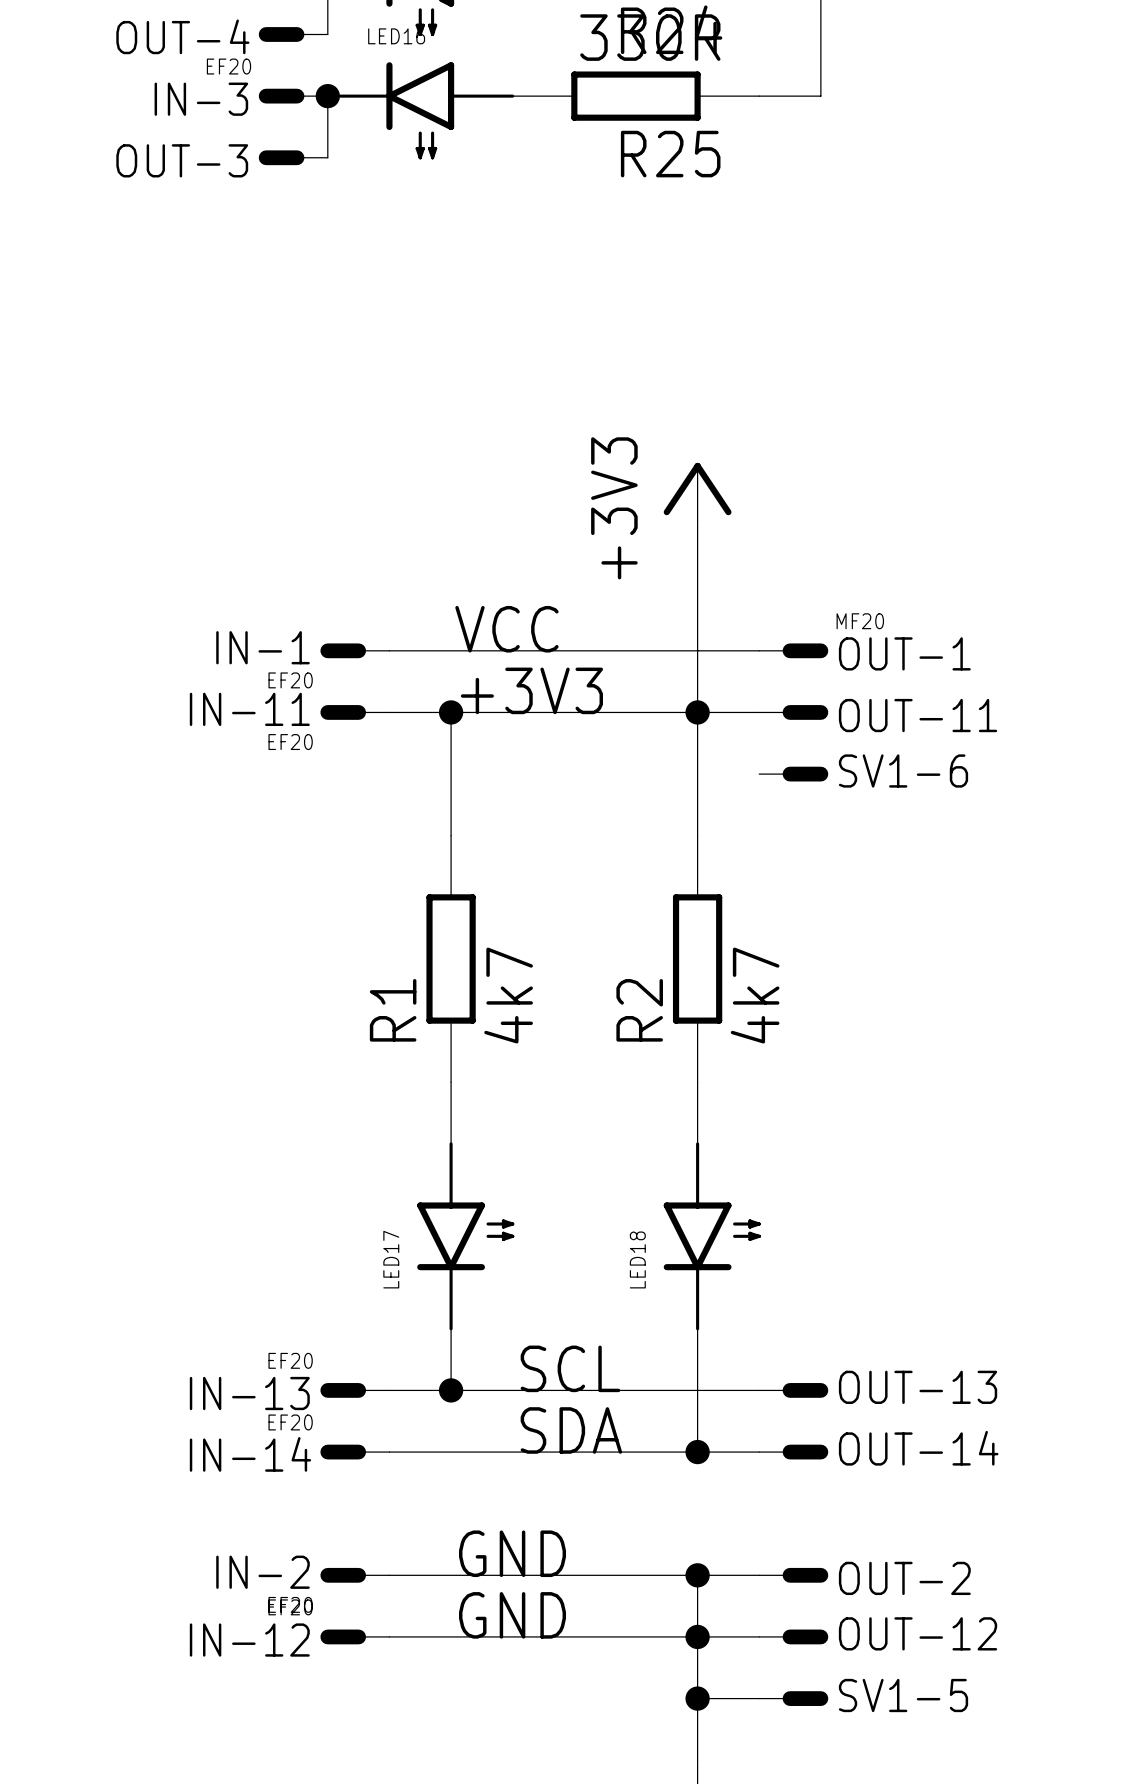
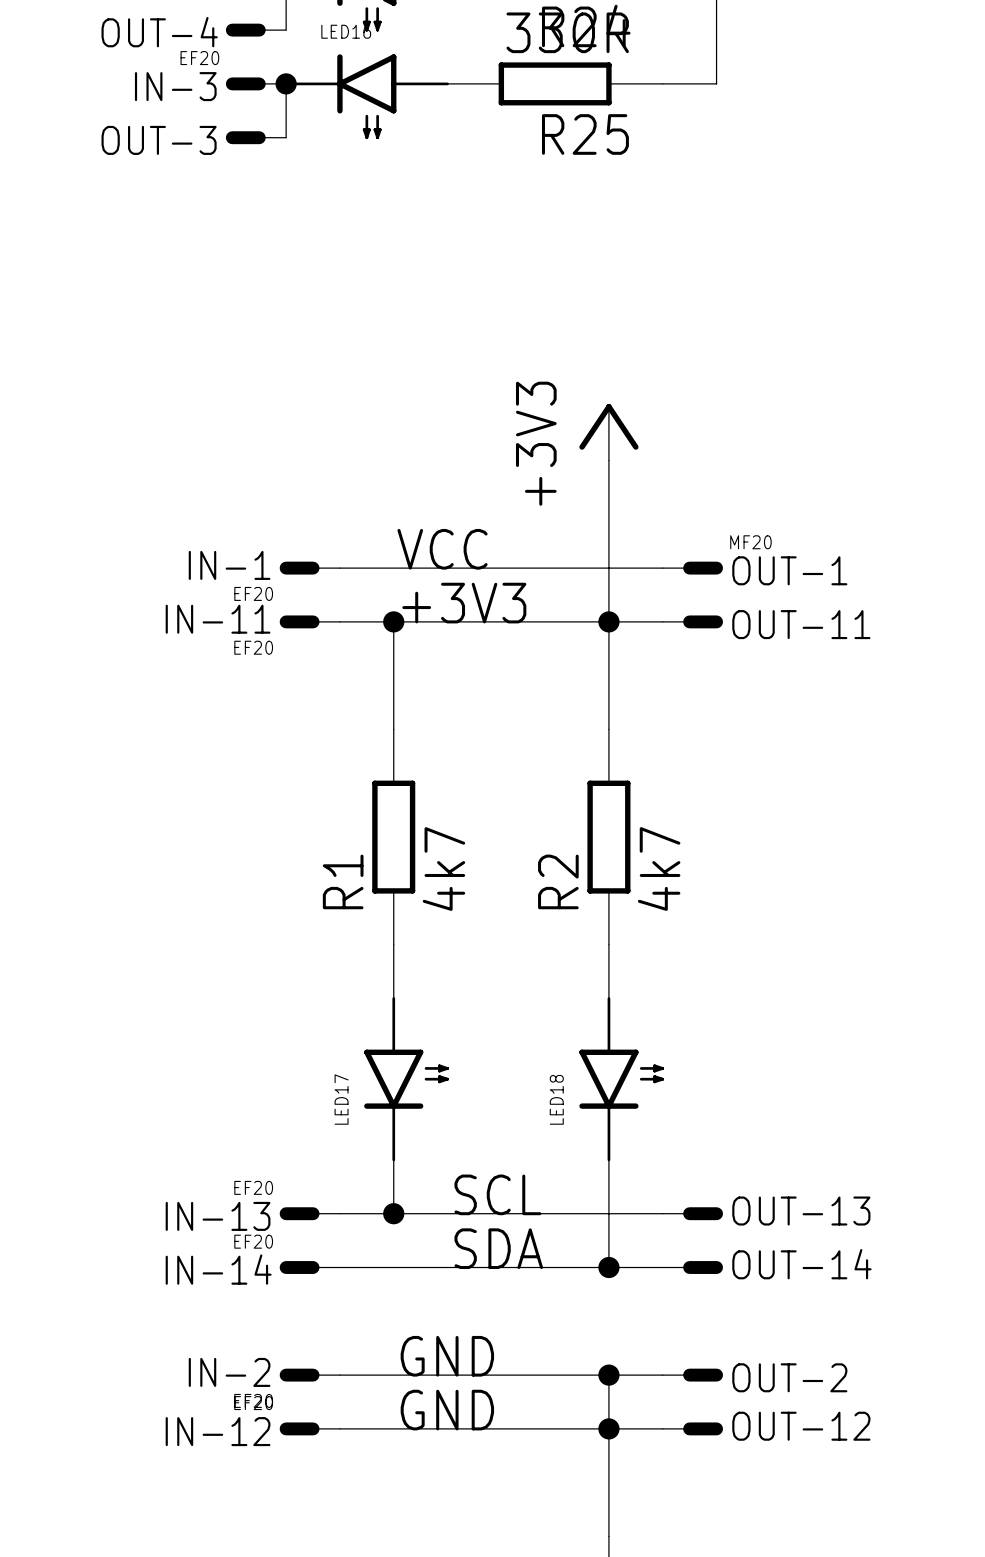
SV1-6: (793, 774) -> none
wire: (697, 1698) (759, 1698) -> none
junction: (697, 1698) -> none
SV1-5: (793, 1698) -> none

